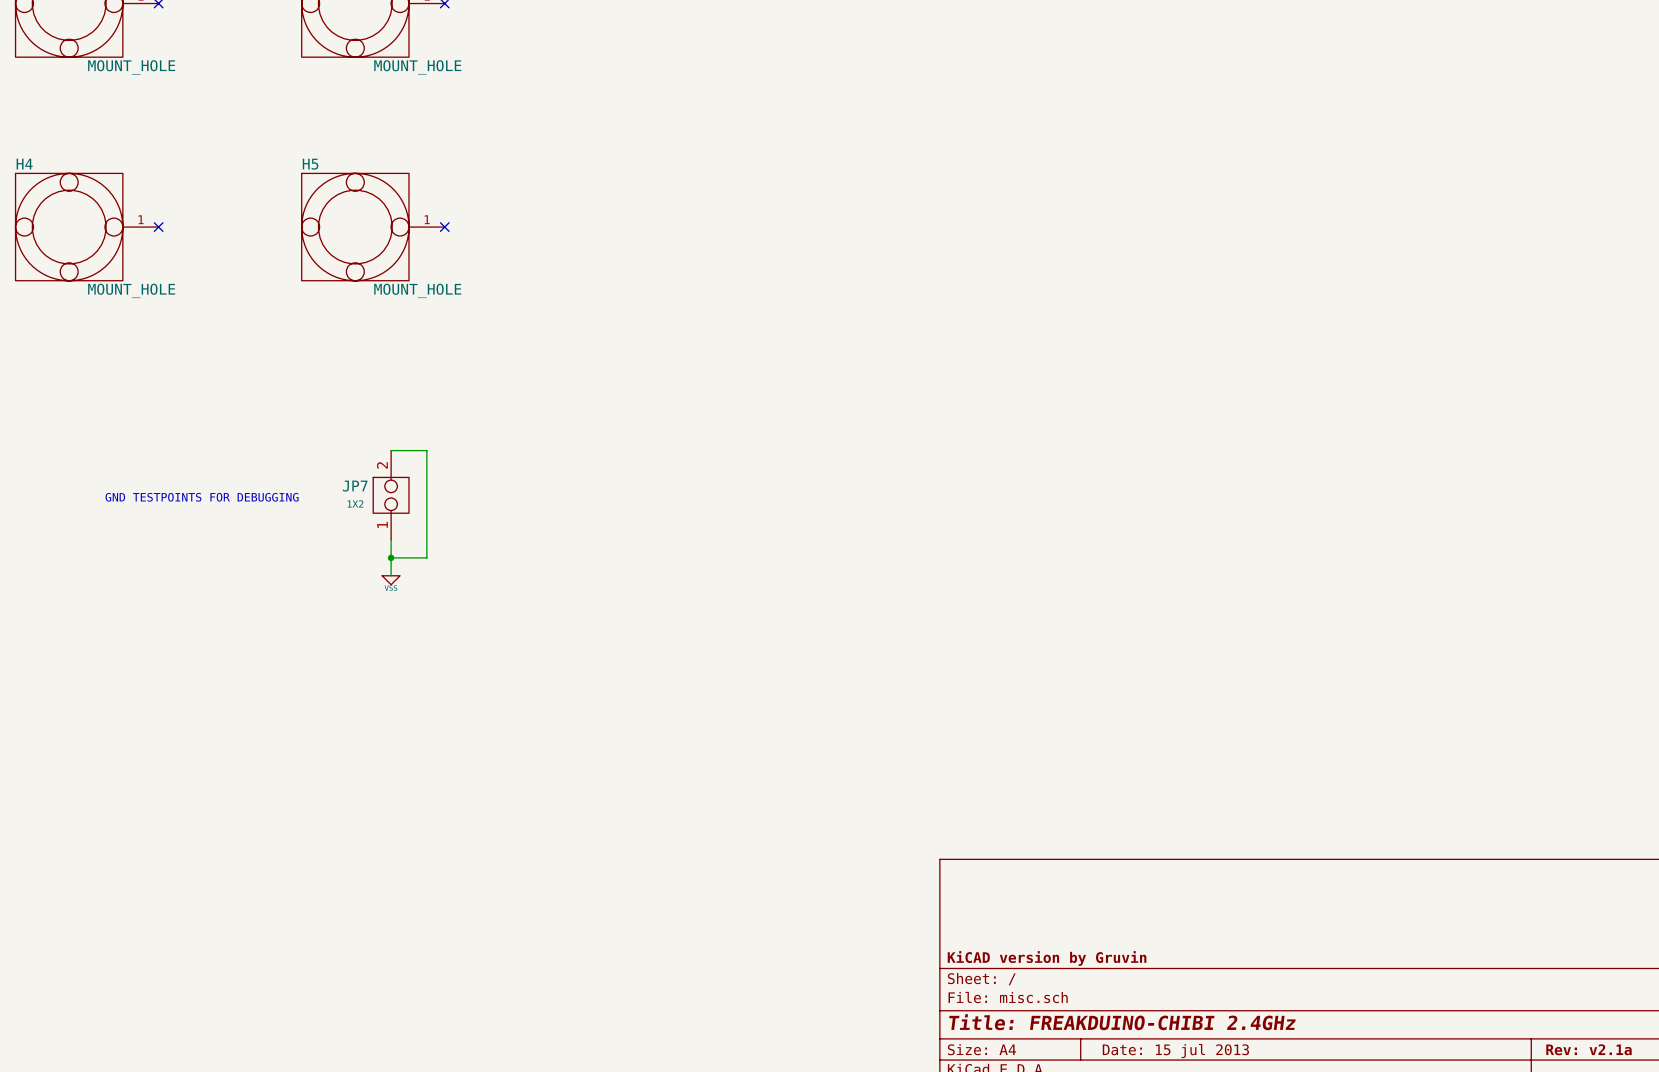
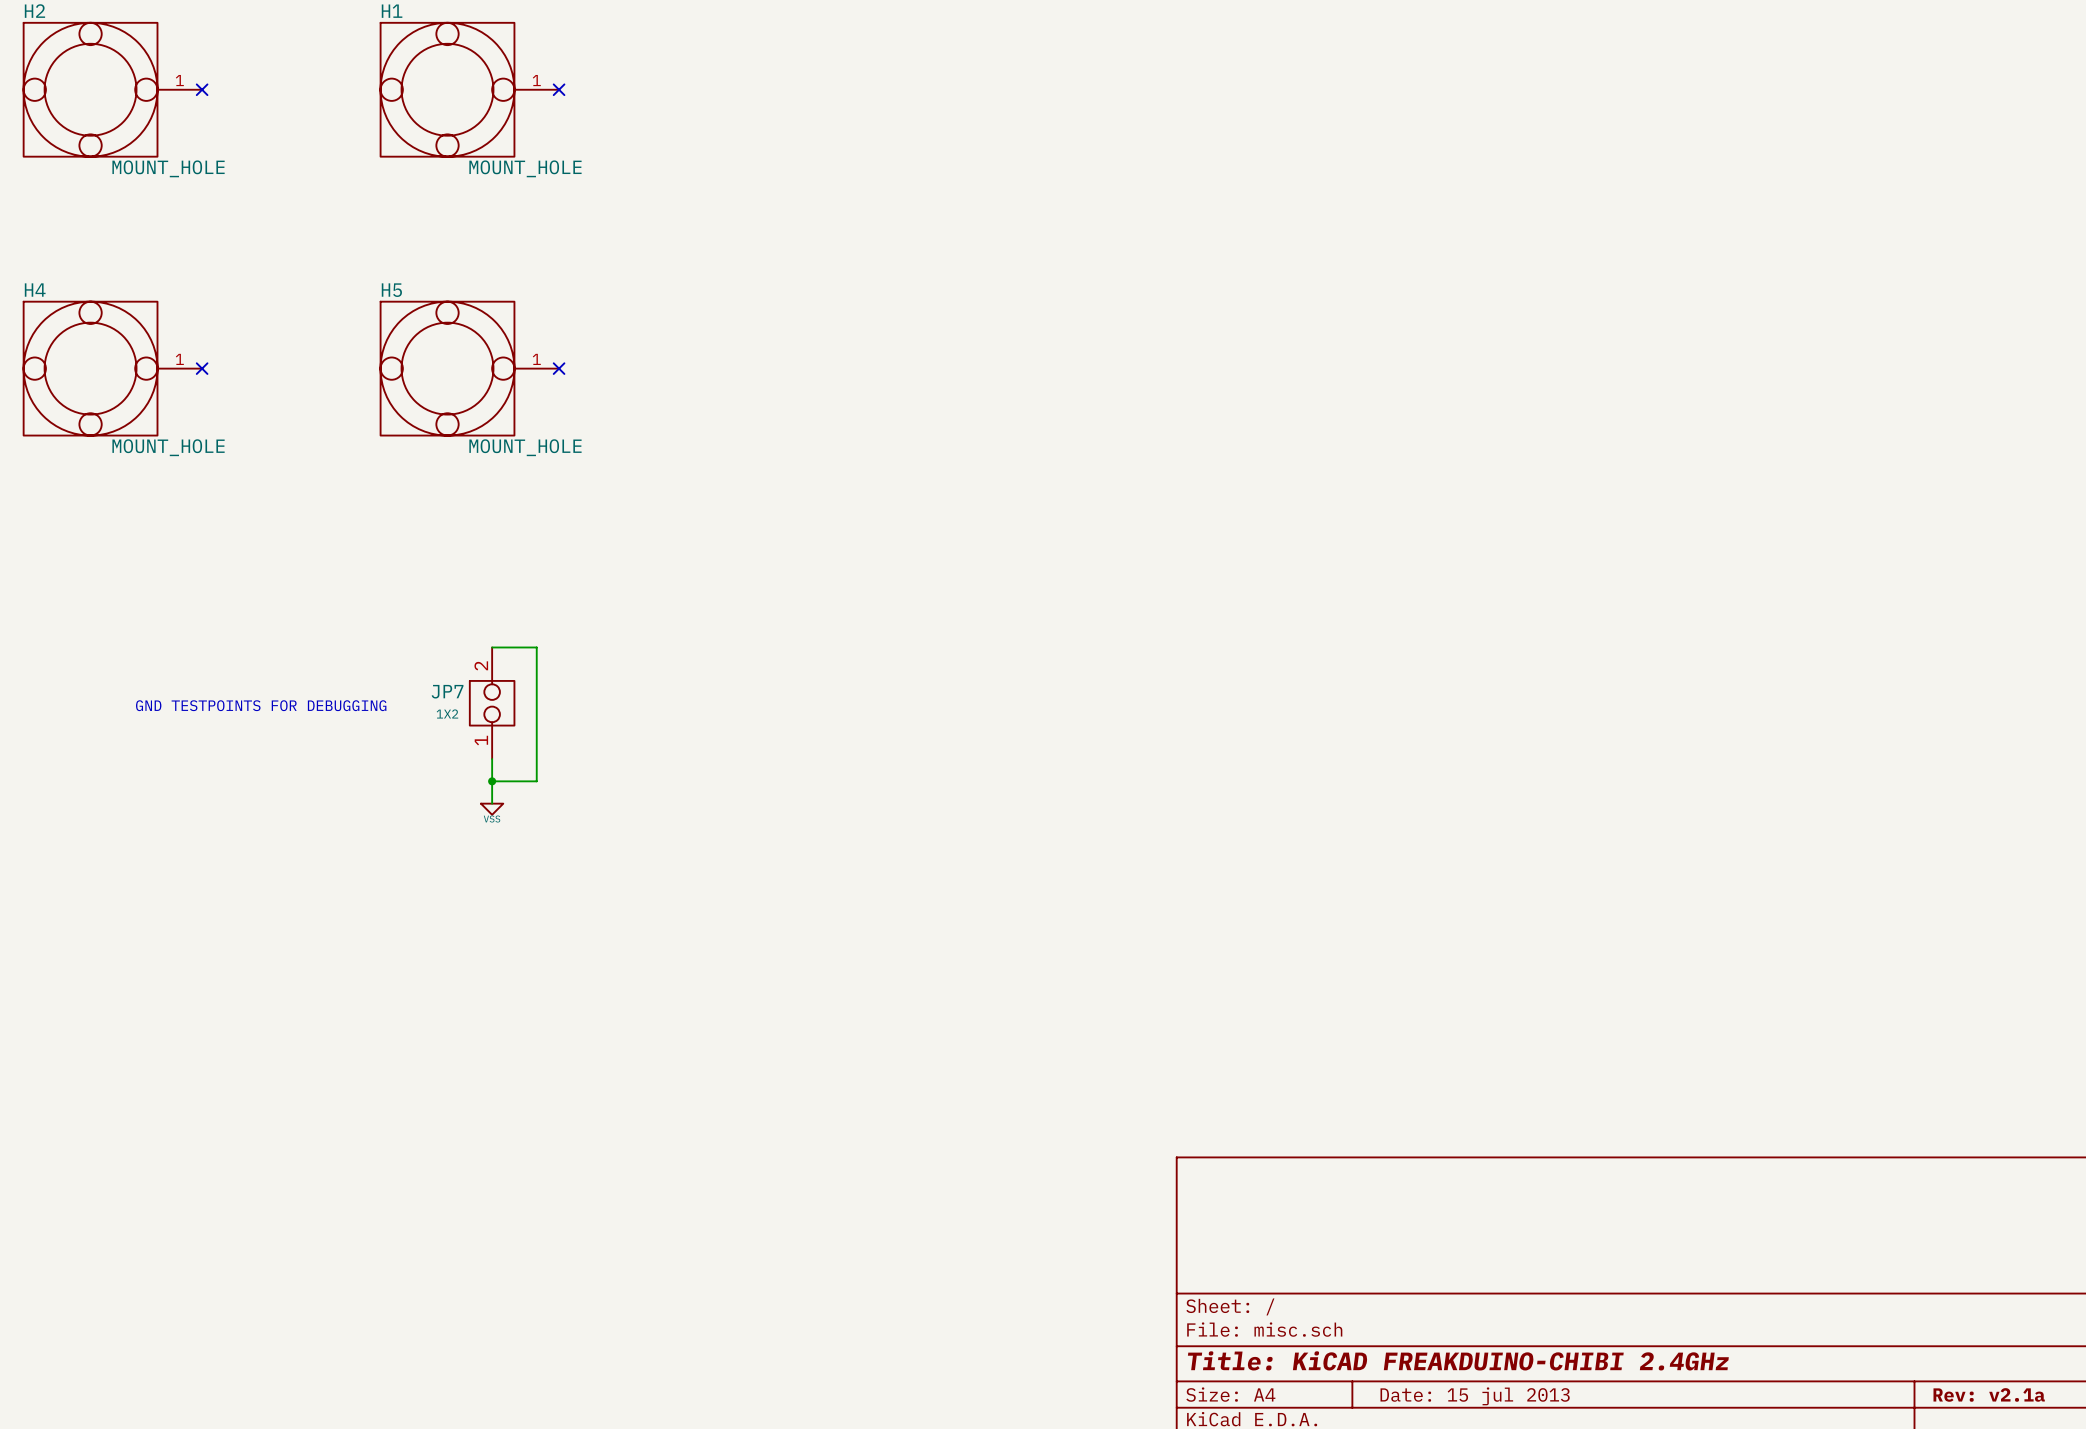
title block: KiCAD version by Gruvin (1047, 958) -> none
title block: Title: FREAKDUINO-CHIBI 2.4GHz (1122, 1022) -> Title: KiCAD FREAKDUINO-CHIBI 2.4GHz (1458, 1360)

